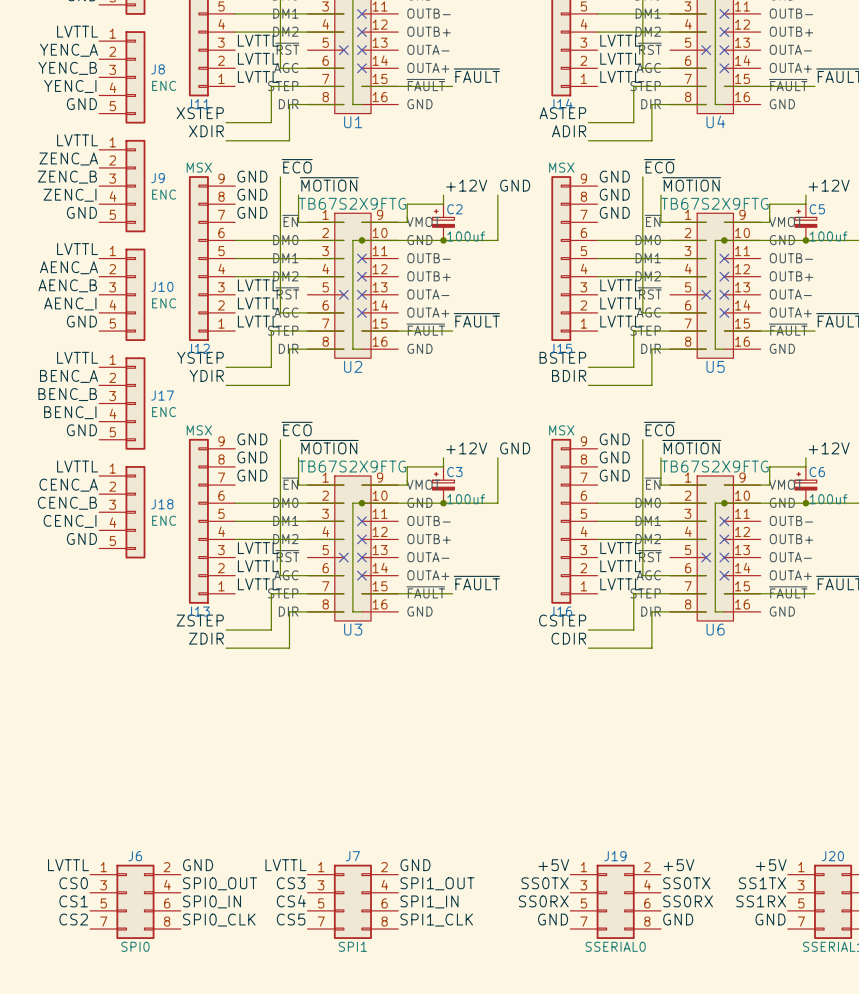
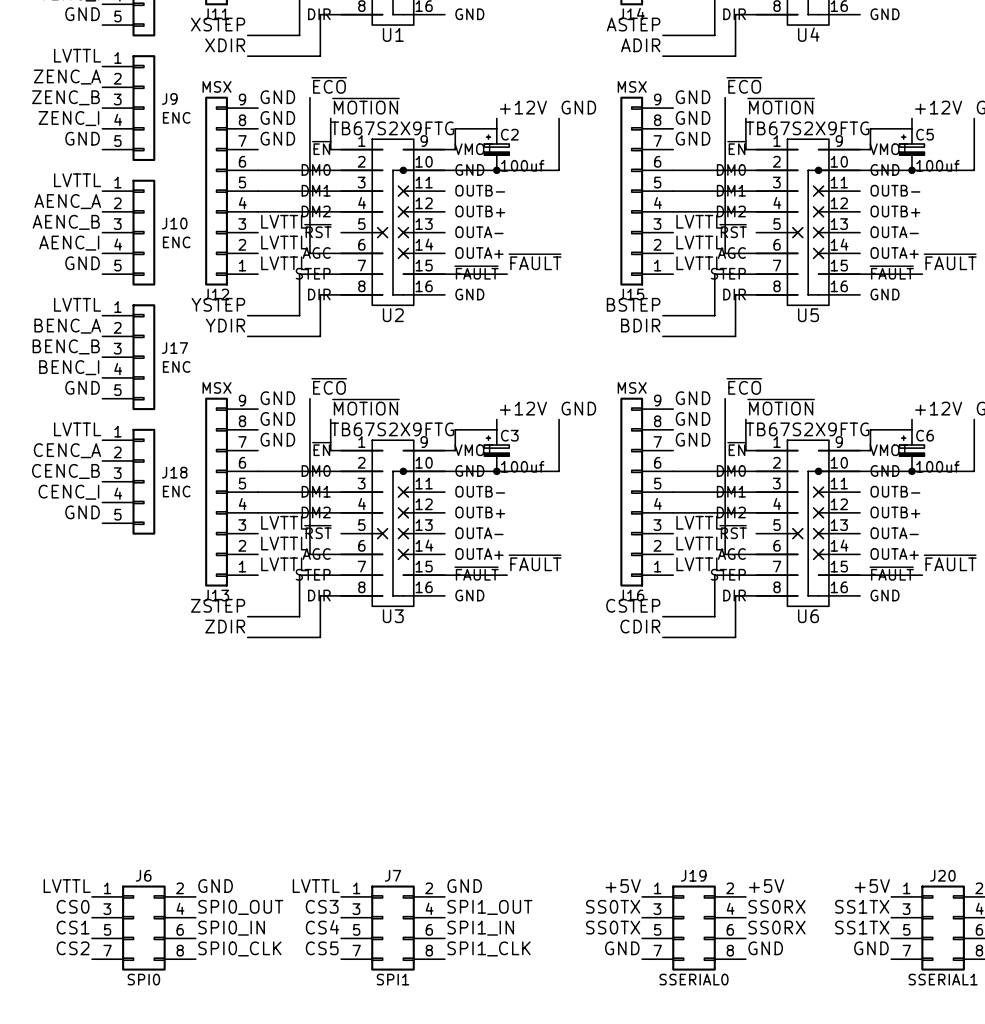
label: SS0TX (686, 883) -> SS0RX (776, 906)
label: SS0RX (543, 901) -> SS0TX (613, 927)
label: SS1RX (761, 901) -> SS1TX (862, 927)

